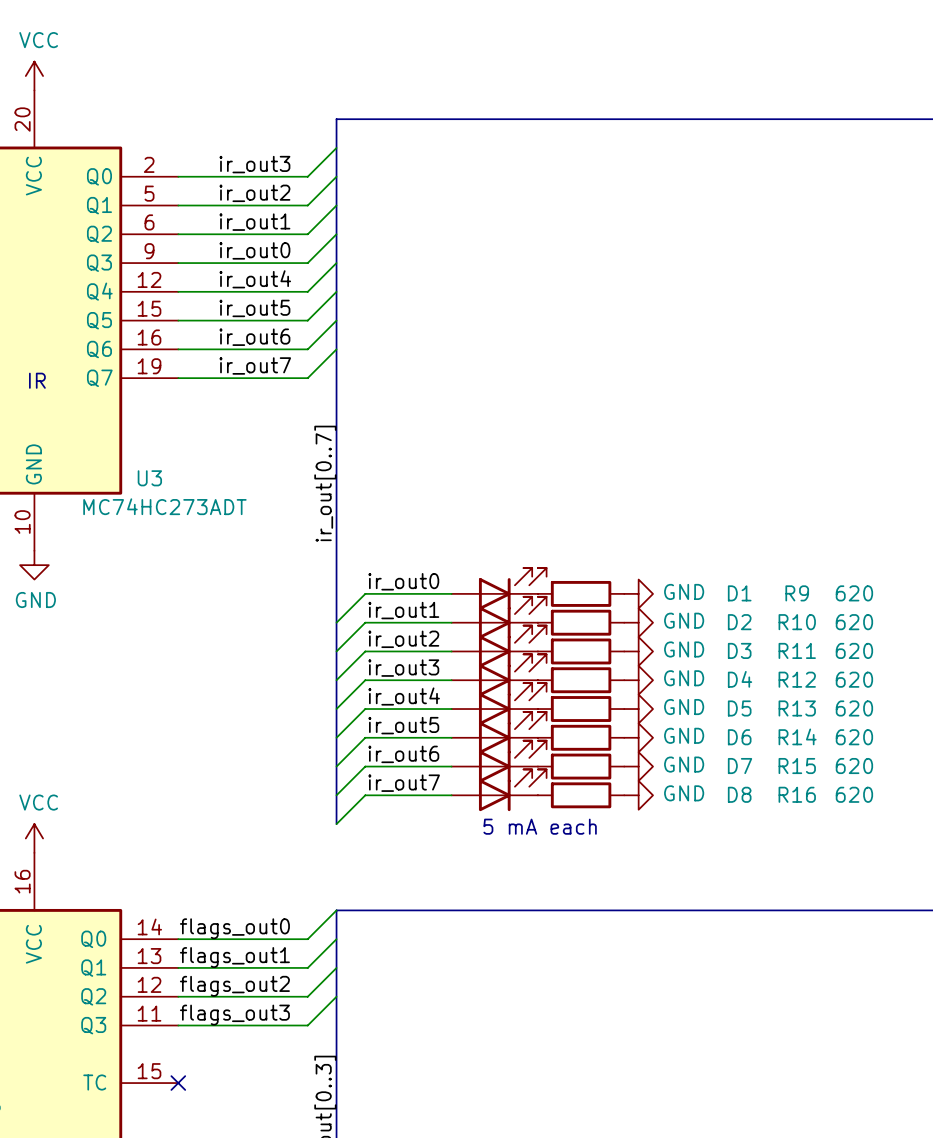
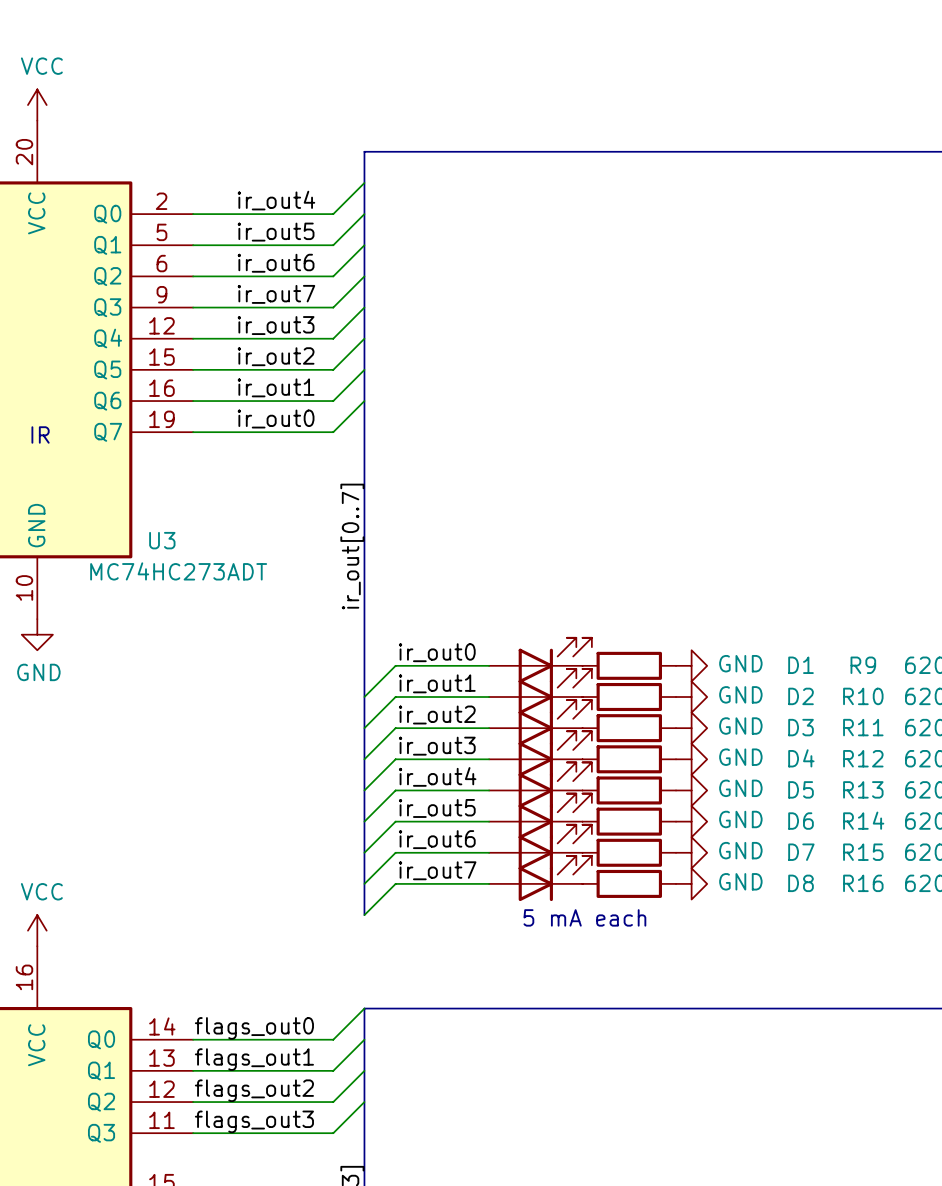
label: ir_out3 (254, 164) -> ir_out4 (276, 200)
label: ir_out2 (254, 193) -> ir_out5 (276, 232)
label: ir_out1 (254, 222) -> ir_out6 (276, 263)
label: ir_out0 (254, 250) -> ir_out7 (276, 294)
label: ir_out4 (255, 279) -> ir_out3 (276, 325)
label: ir_out5 (254, 308) -> ir_out2 (276, 356)
label: ir_out6 (254, 337) -> ir_out1 (276, 387)
label: ir_out7 (255, 365) -> ir_out0 (276, 419)

